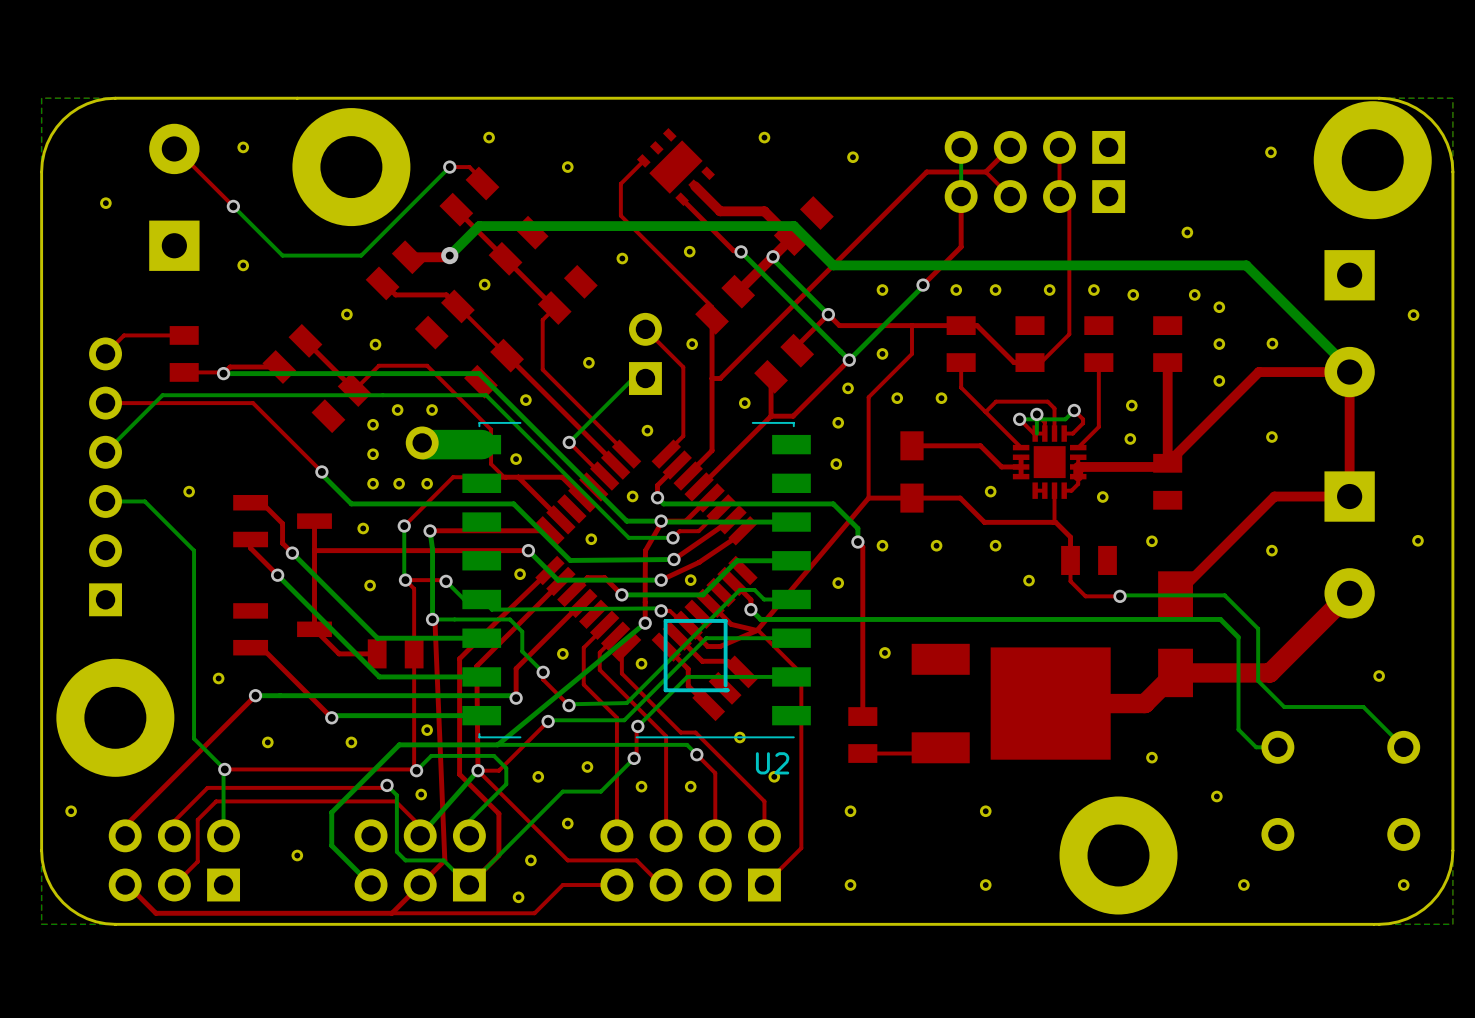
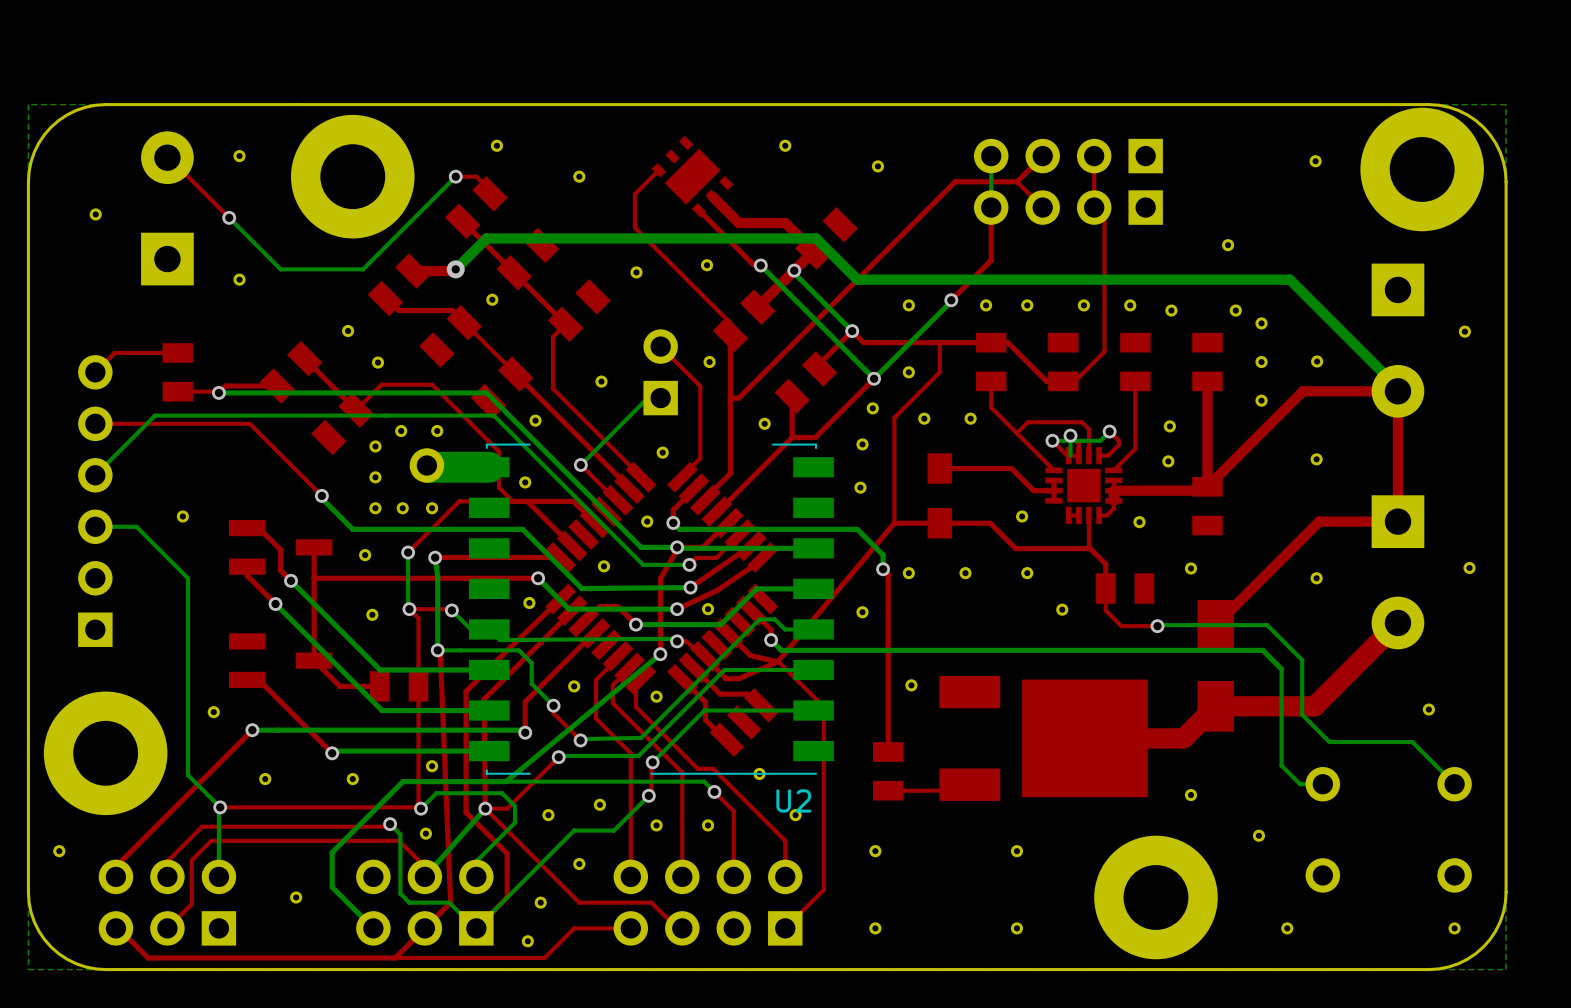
line: (725, 685) (725, 620) (665, 620) (665, 690) (727, 690) -> none

